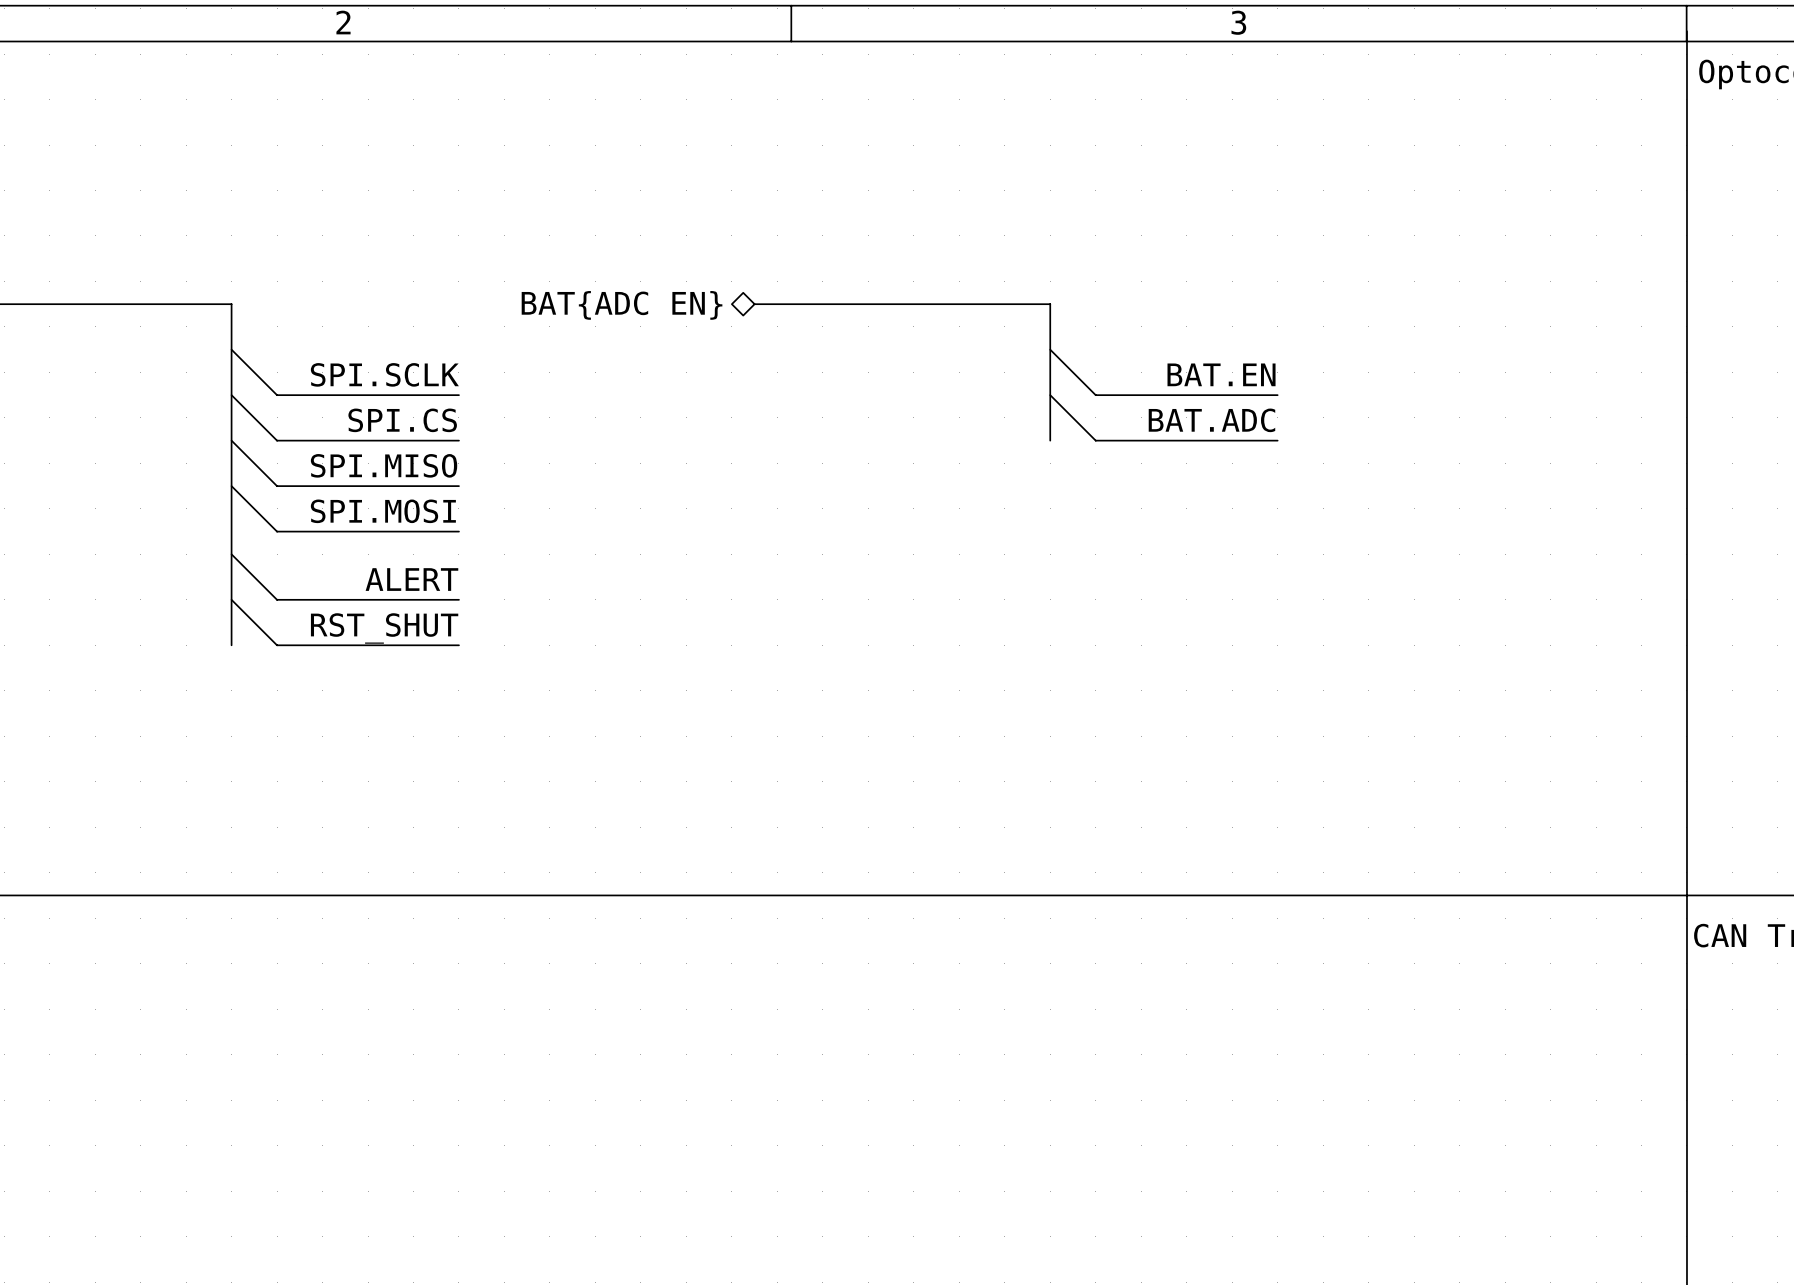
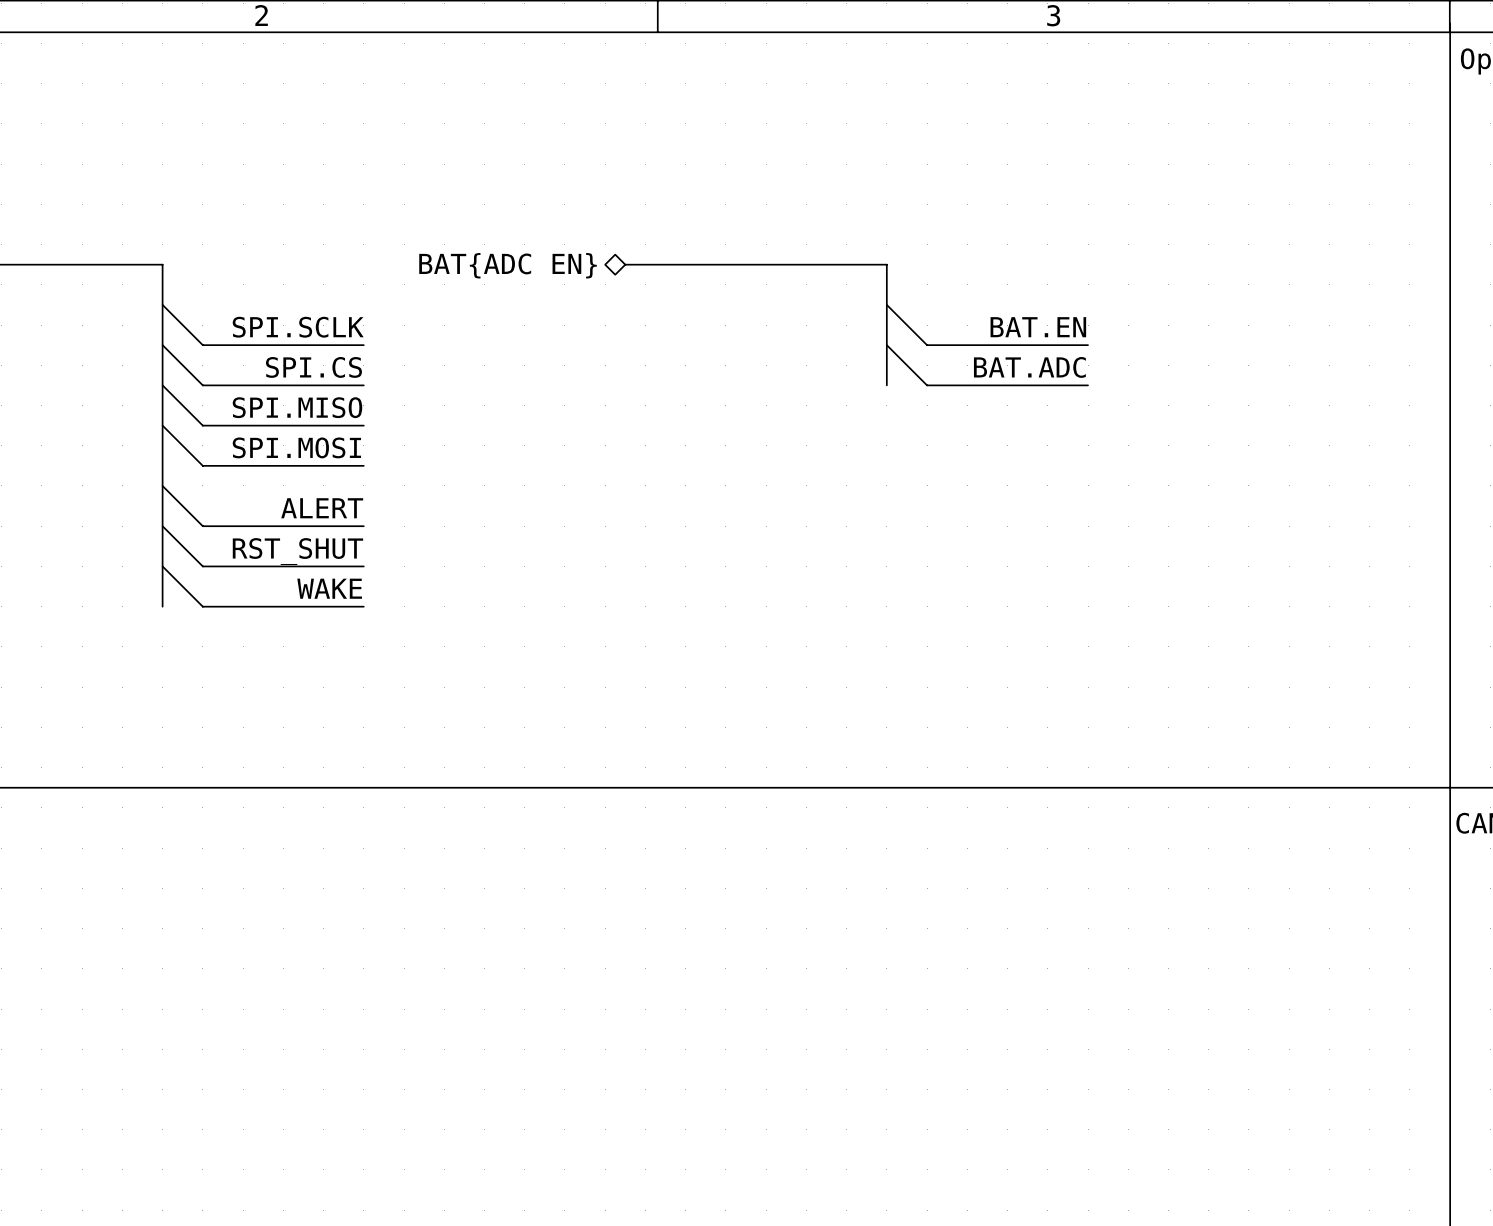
wire: none -> (162, 566) (202, 606) (363, 606)
bus: none -> (162, 566) (162, 606)
label: none -> WAKE (329, 588)

